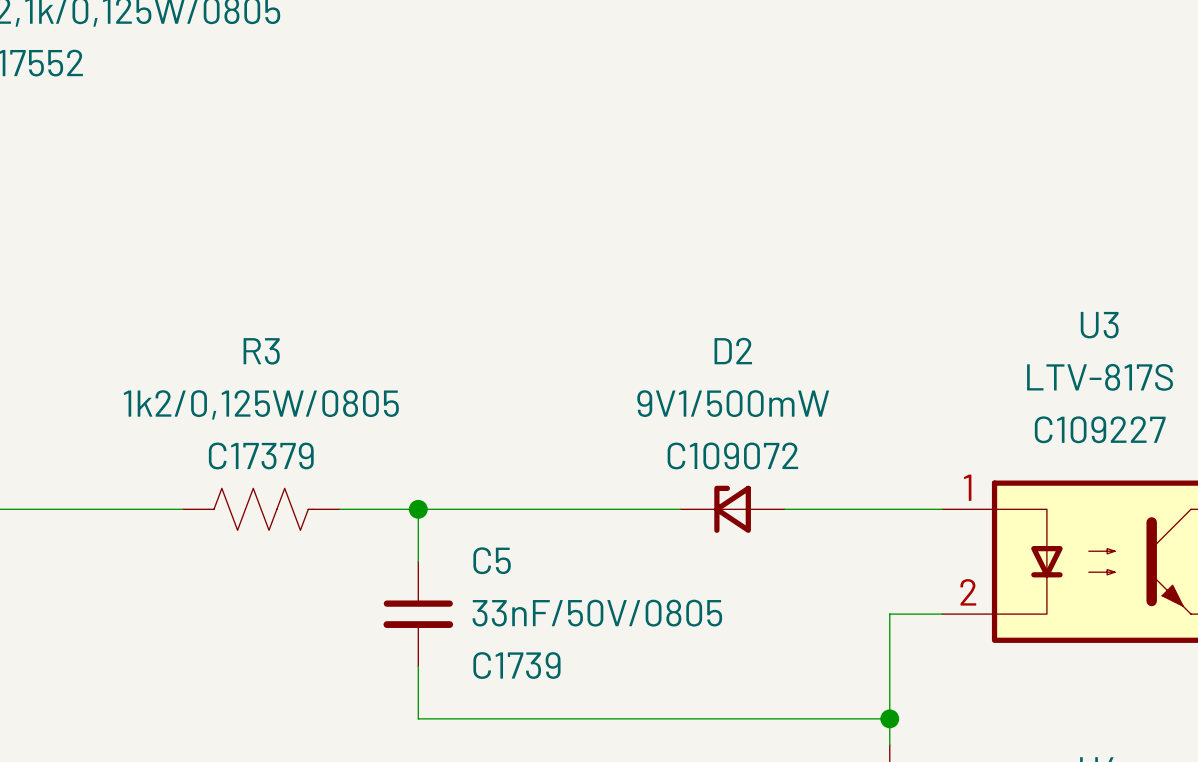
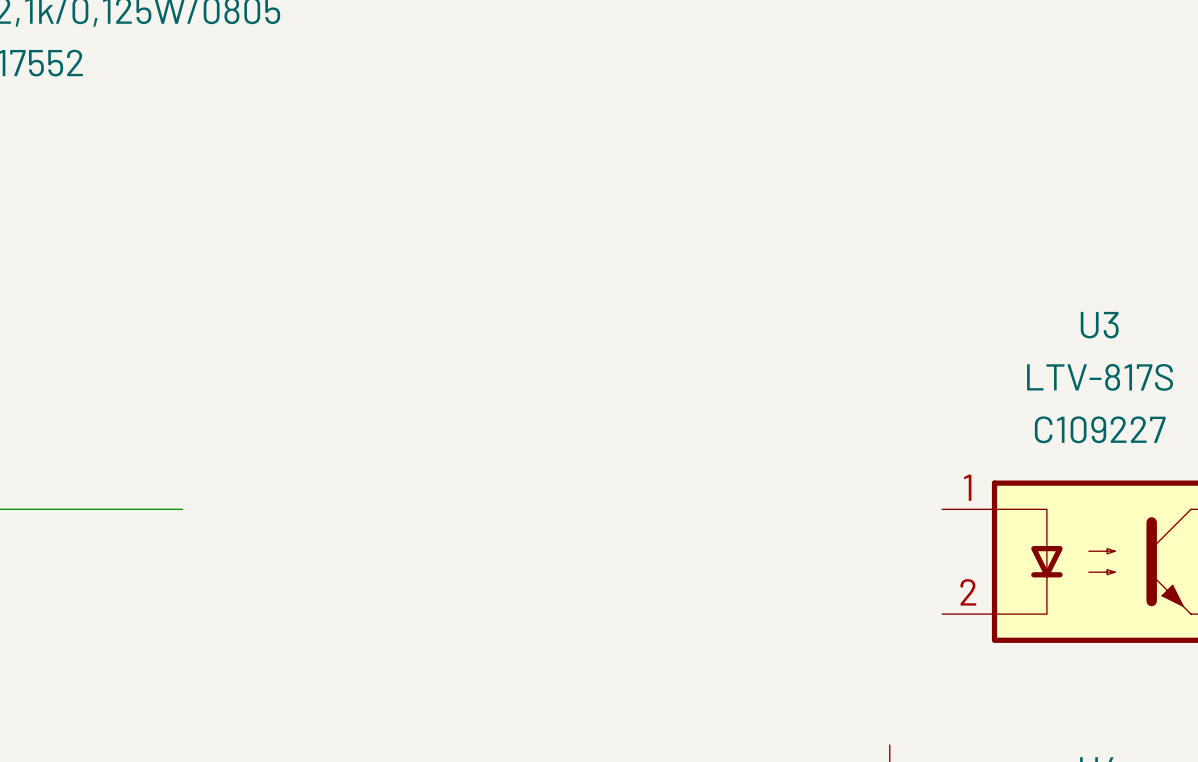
R3: 1k2/0,125W/0805 (261, 509) -> none
wire: (339, 509) (680, 509) -> none
wire: (418, 509) (418, 561) -> none
junction: (418, 509) -> none
D2: 9V1/500mW (732, 509) -> none
wire: (784, 509) (942, 509) -> none
C5: 33nF/50V/0805 (418, 614) -> none
wire: (942, 614) (889, 614) (889, 745) -> none
wire: (418, 666) (418, 718) (889, 718) -> none
junction: (889, 718) -> none

